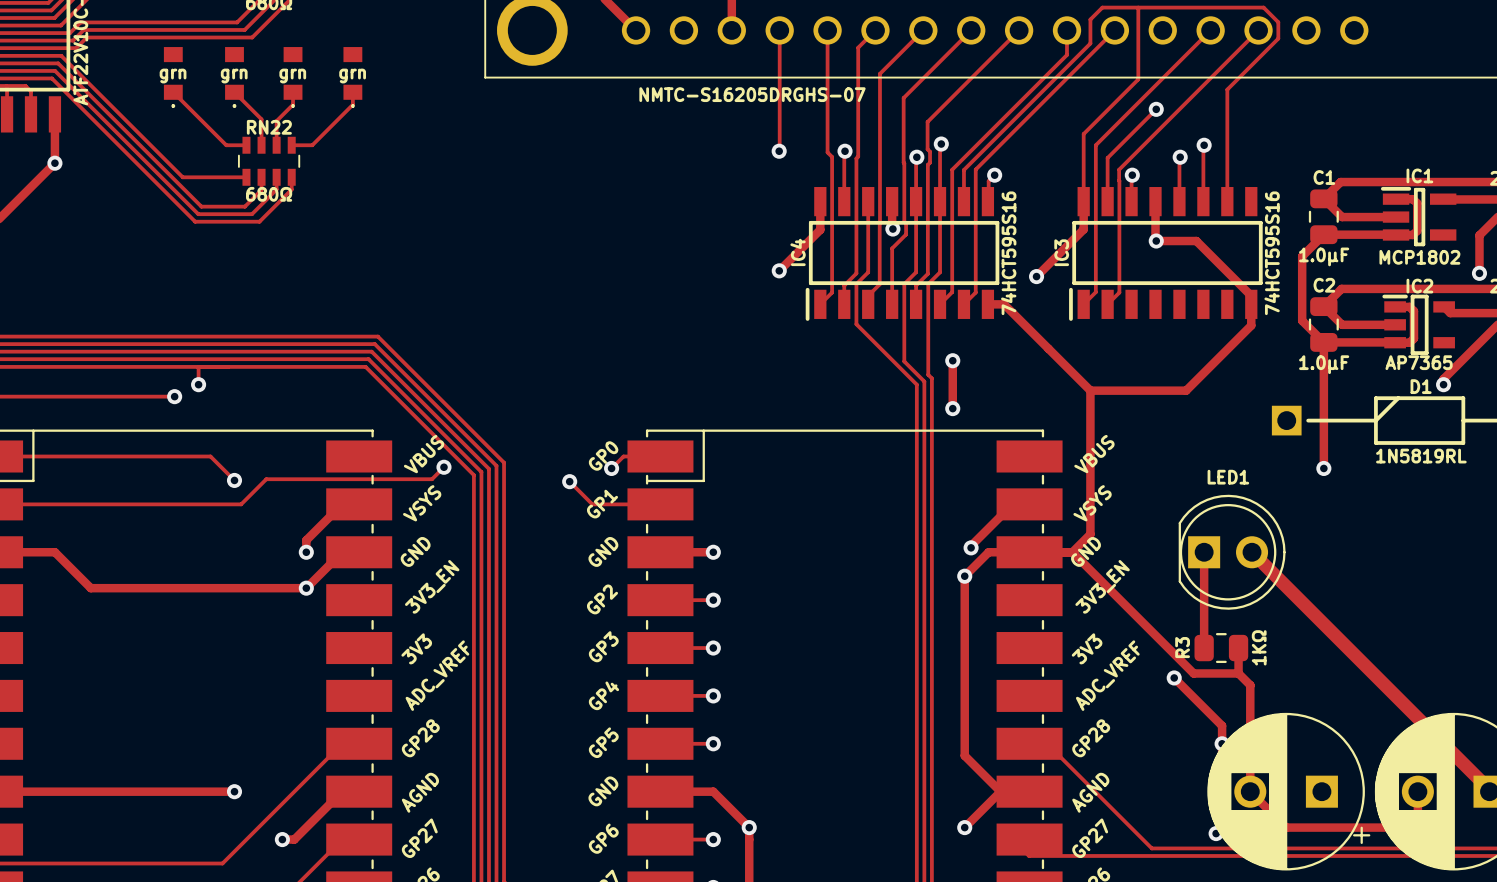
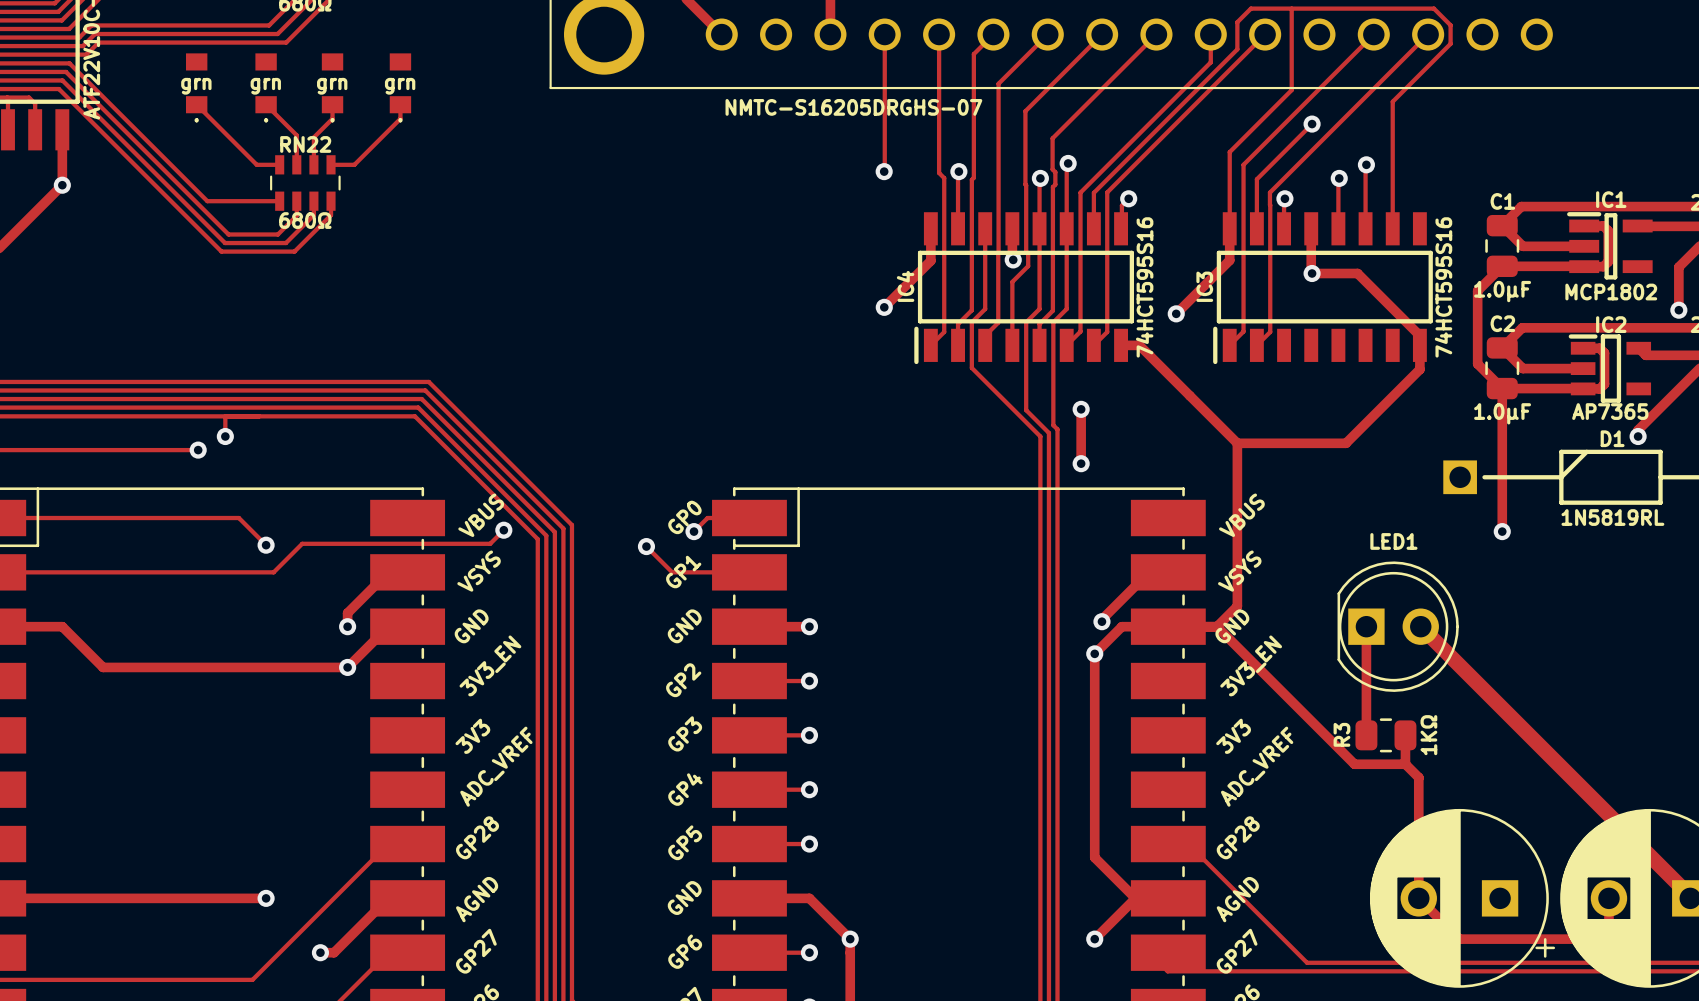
track: (1174, 677) (1222, 725) (1222, 827) (1216, 833) -> none
via: (1174, 677) -> none
via: (1222, 743) -> none
via: (1216, 833) -> none

